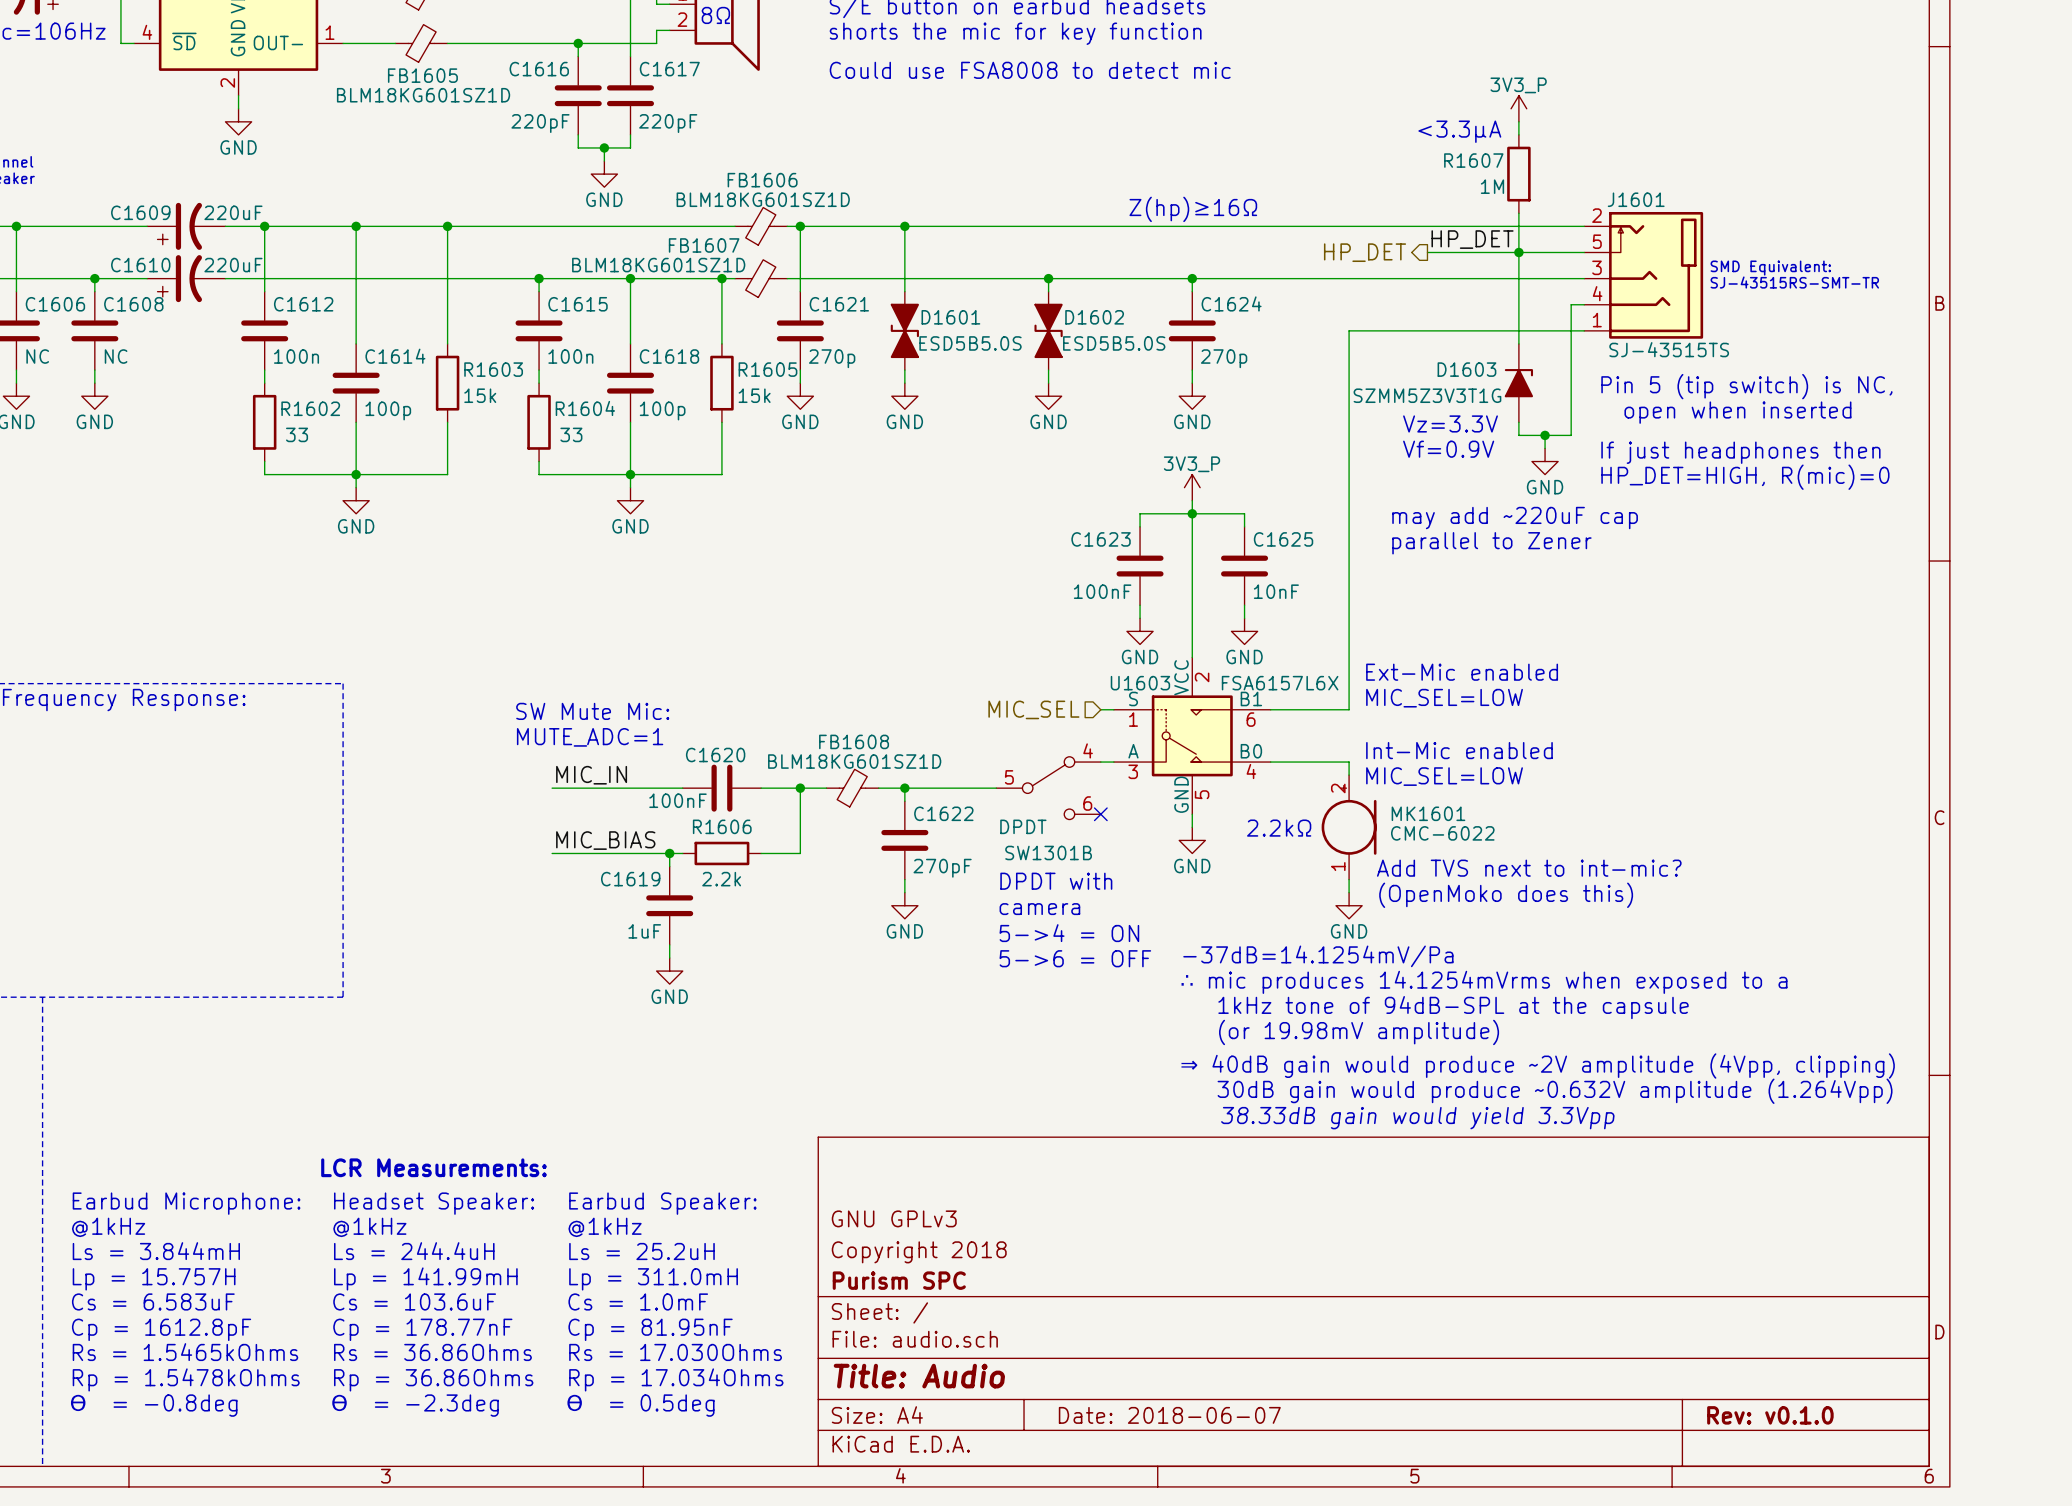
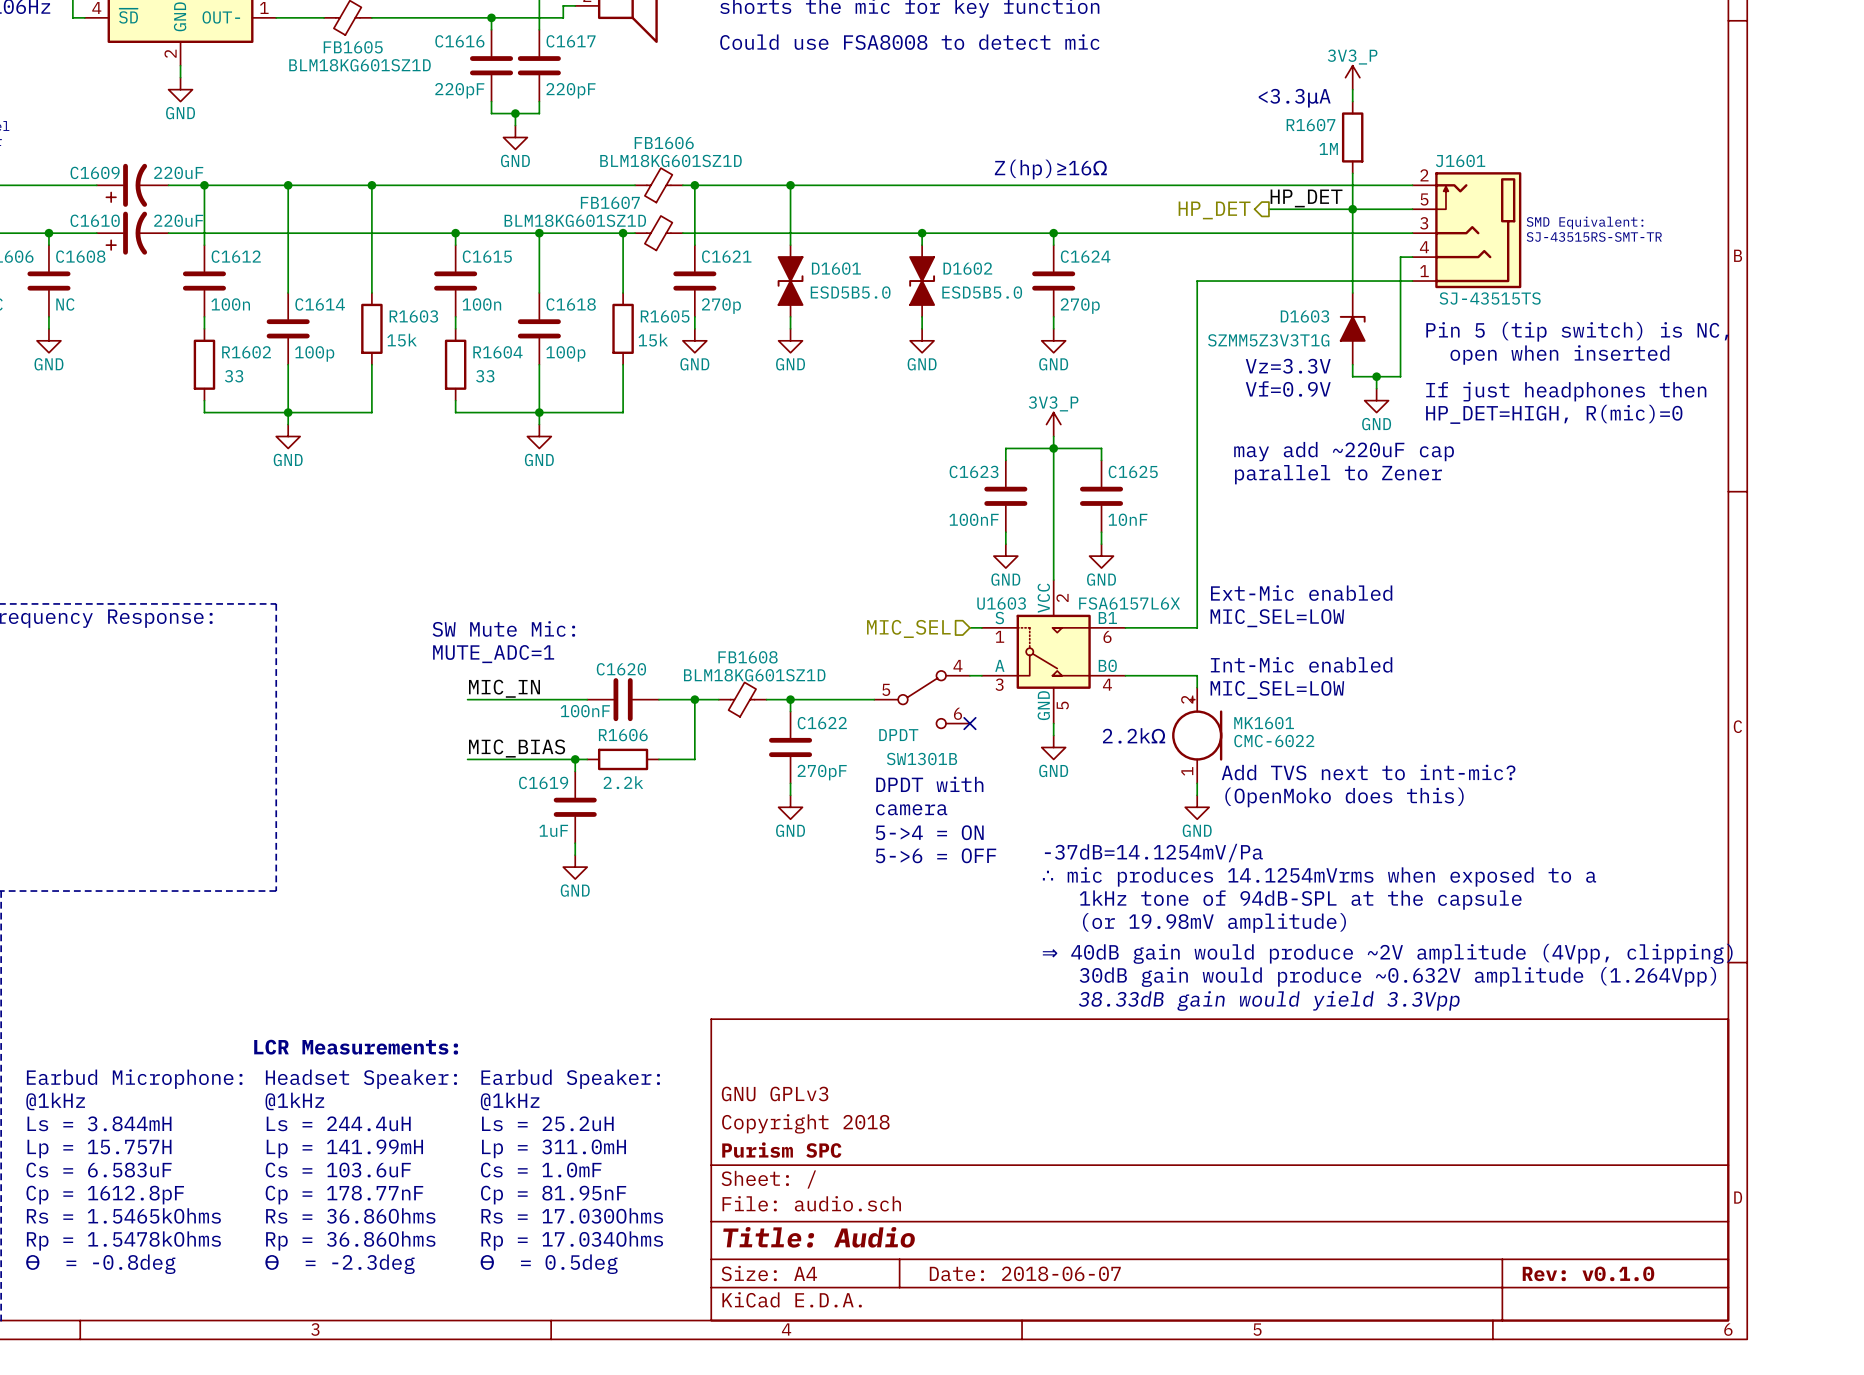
D1601 flip: as is (904, 330) -> left-right (790, 281)
D1602 flip: as is (1048, 330) -> left-right (922, 281)
D1601 value: ESD5B5.0S (970, 343) -> ESD5B5.0 (850, 292)
D1602 value: ESD5B5.0S (1114, 343) -> ESD5B5.0 (982, 292)

